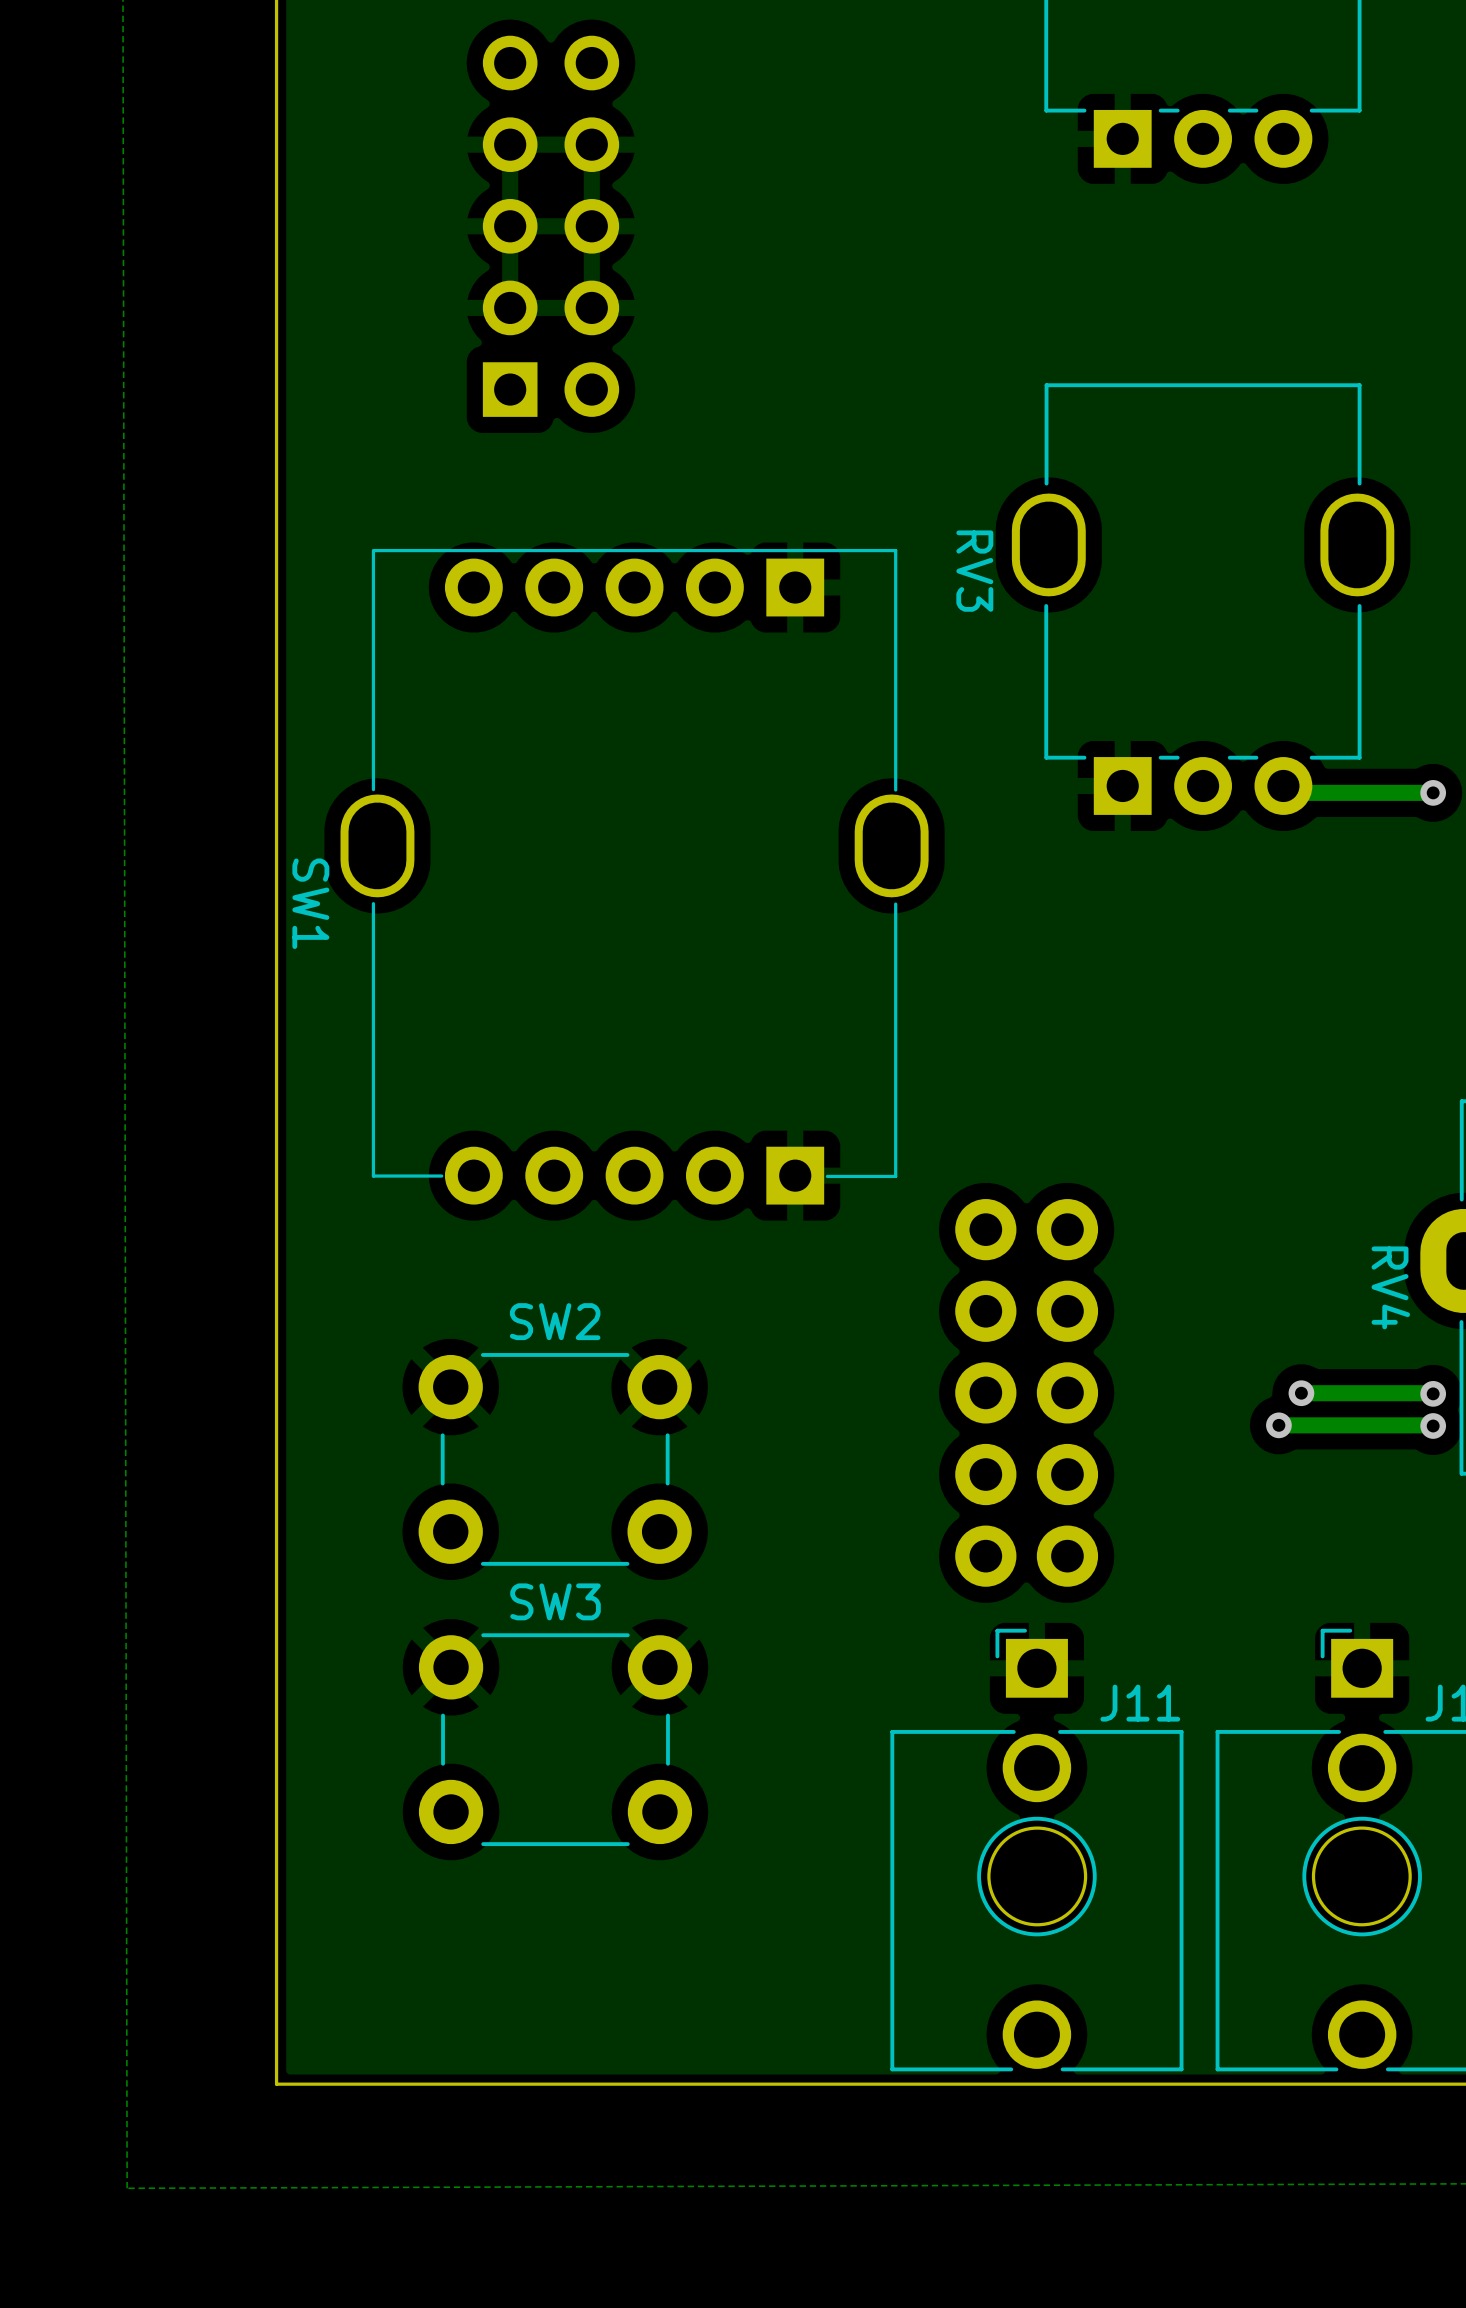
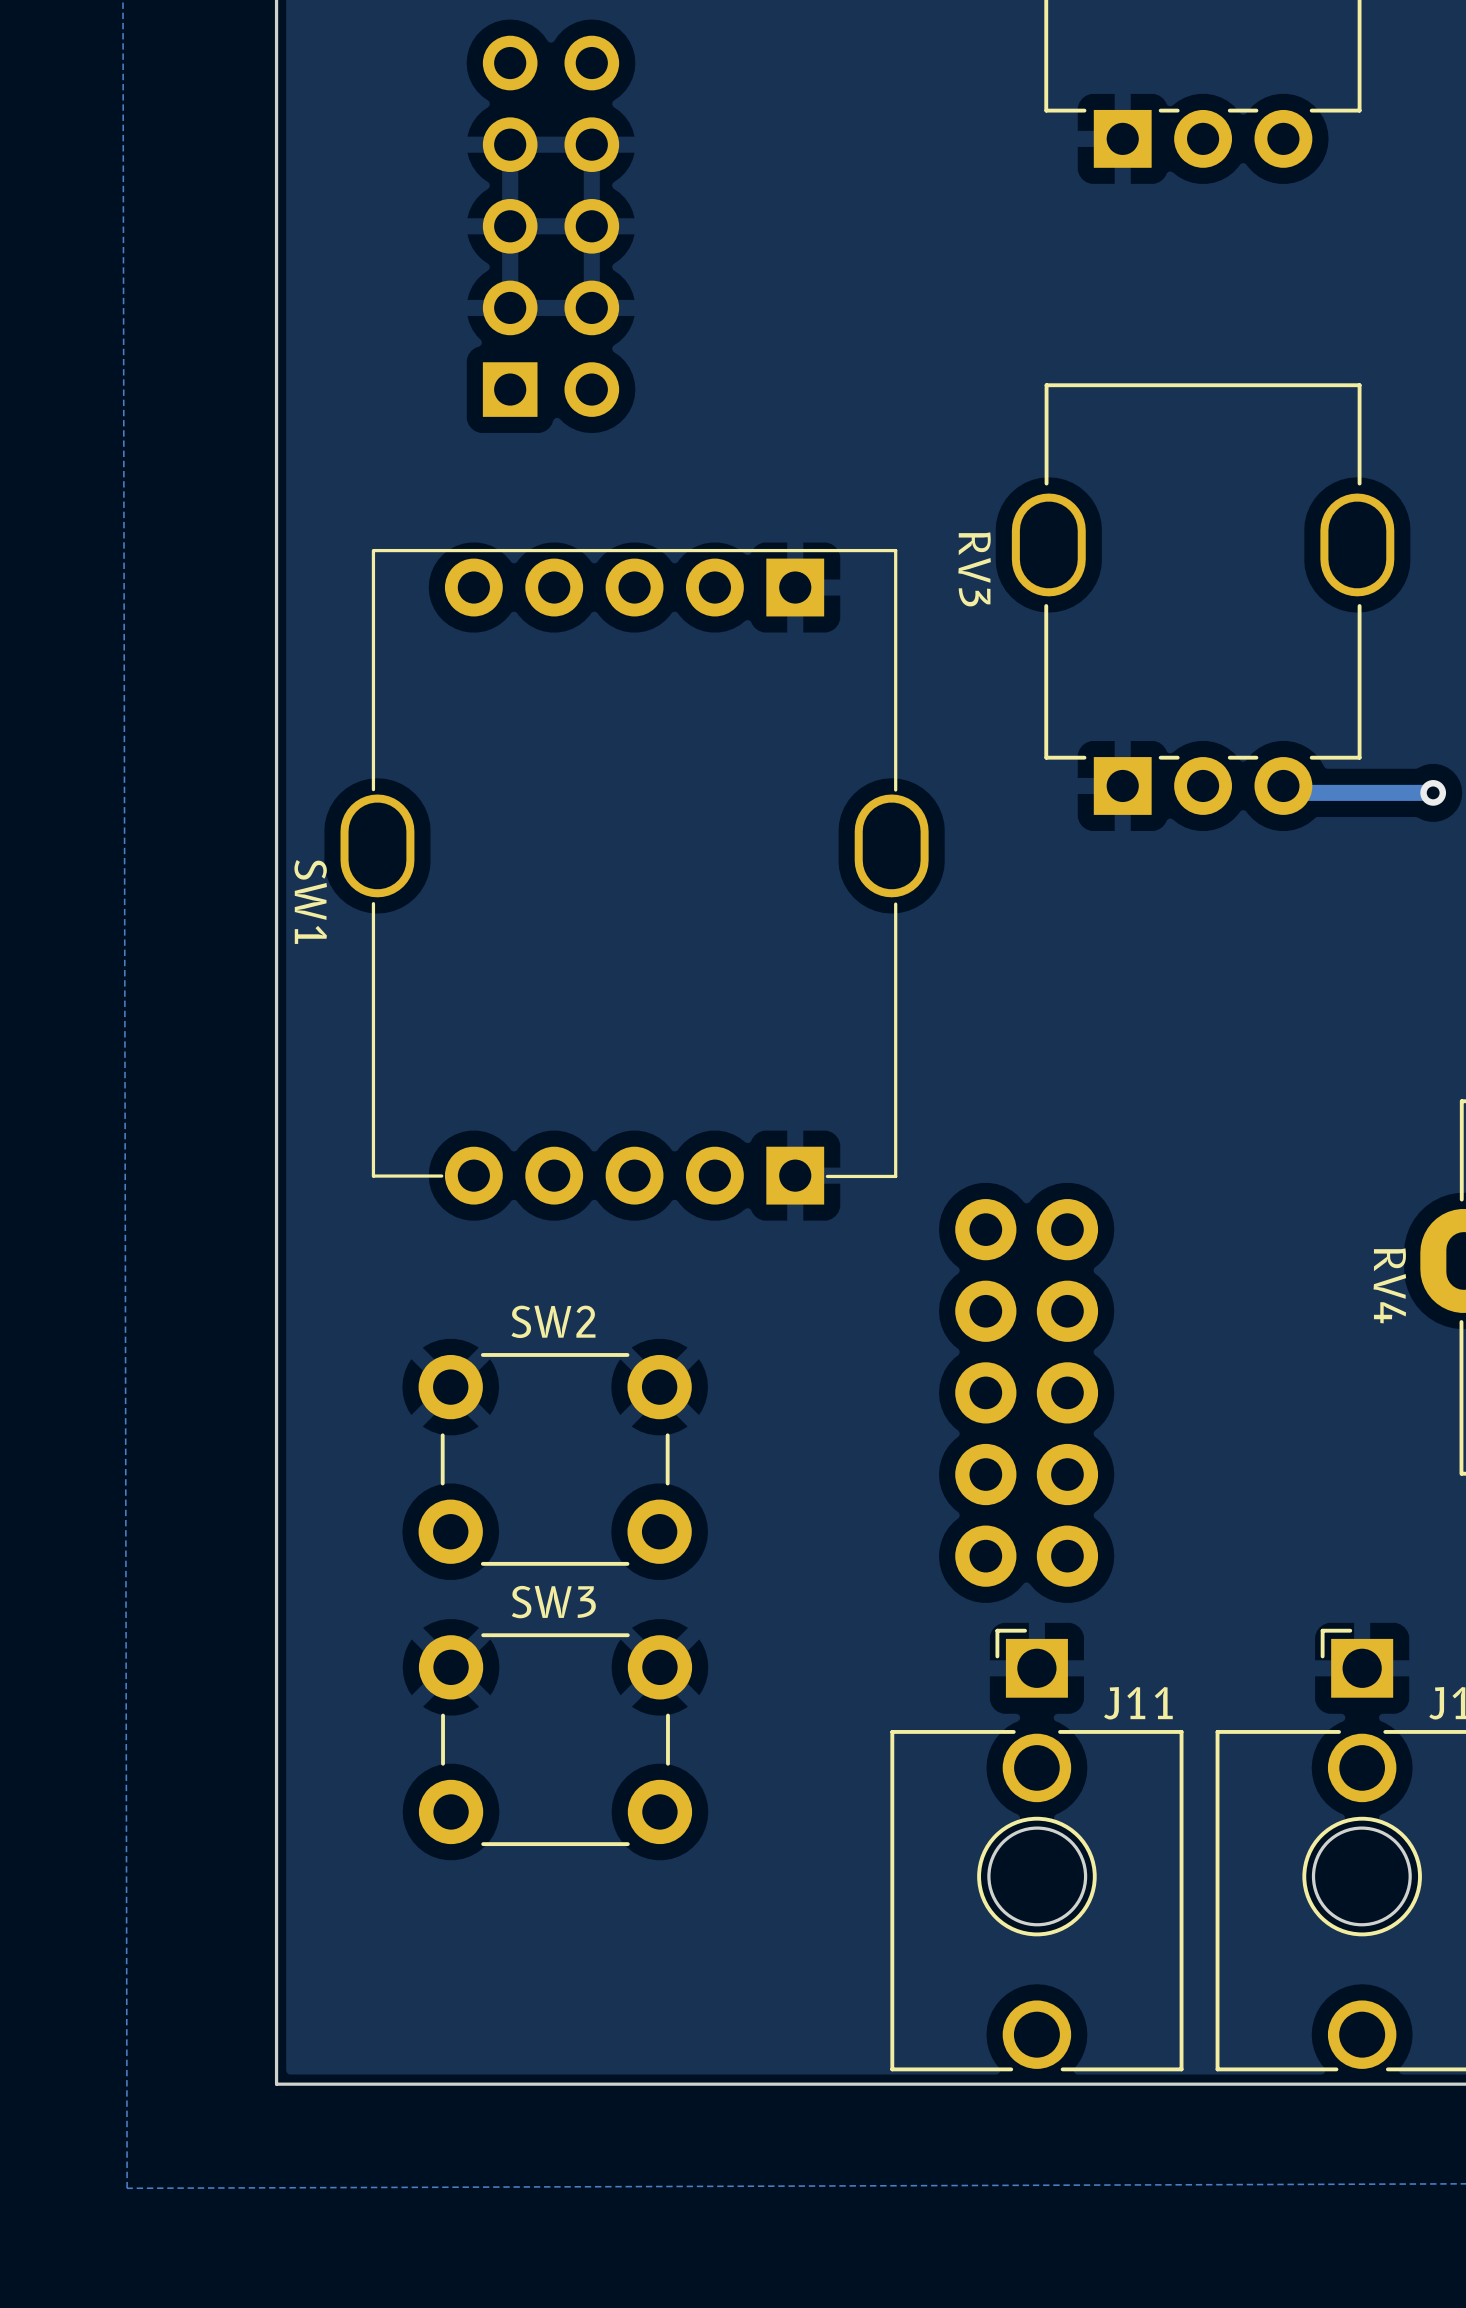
track: (1301, 1393) (1433, 1393) -> none
via: (1301, 1393) -> none
via: (1433, 1393) -> none
track: (1278, 1425) (1433, 1425) -> none
via: (1278, 1425) -> none
via: (1433, 1425) -> none

